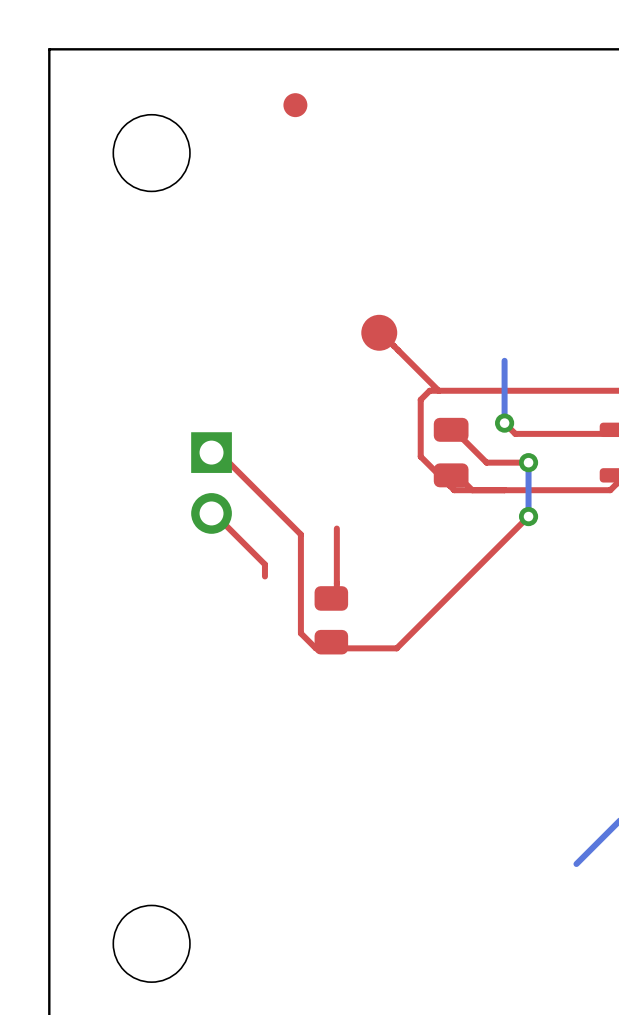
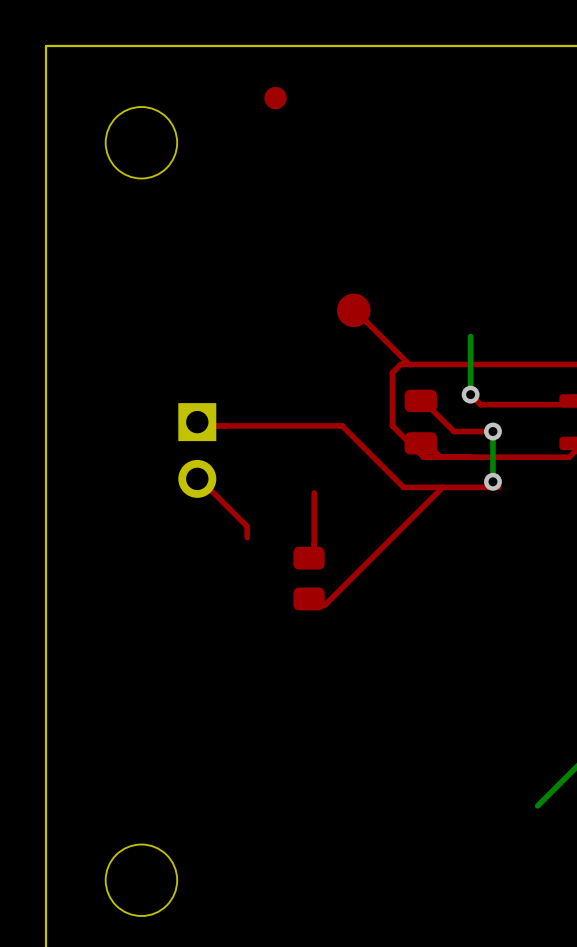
top track: (223, 456) (300, 534) (300, 633) (315, 648) (342, 648) -> (208, 425) (342, 425) (403, 487) (498, 487) (498, 481)
top track: (528, 516) (396, 648) (348, 648) -> (442, 487) (325, 604)

